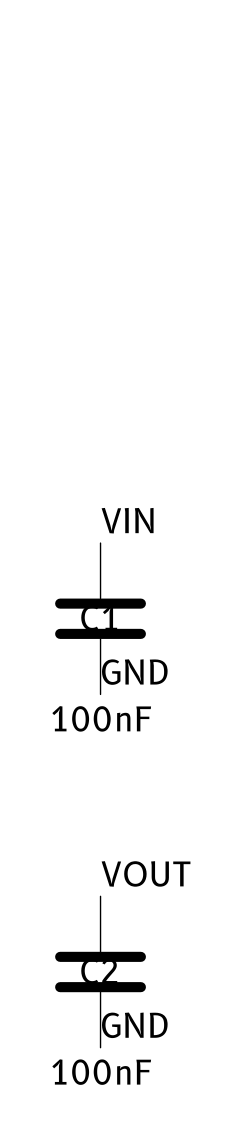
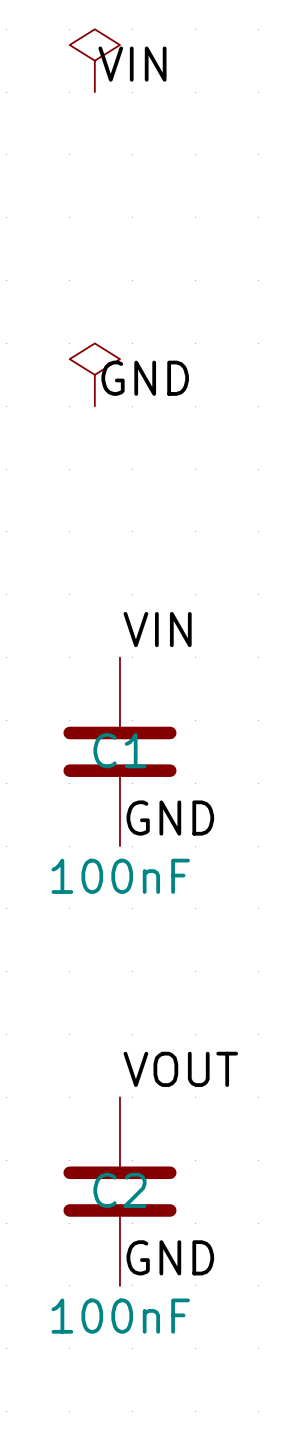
power symbol: none -> (94, 60)
label: none -> VIN (132, 64)
power symbol: none -> (94, 374)
label: none -> GND (145, 378)

